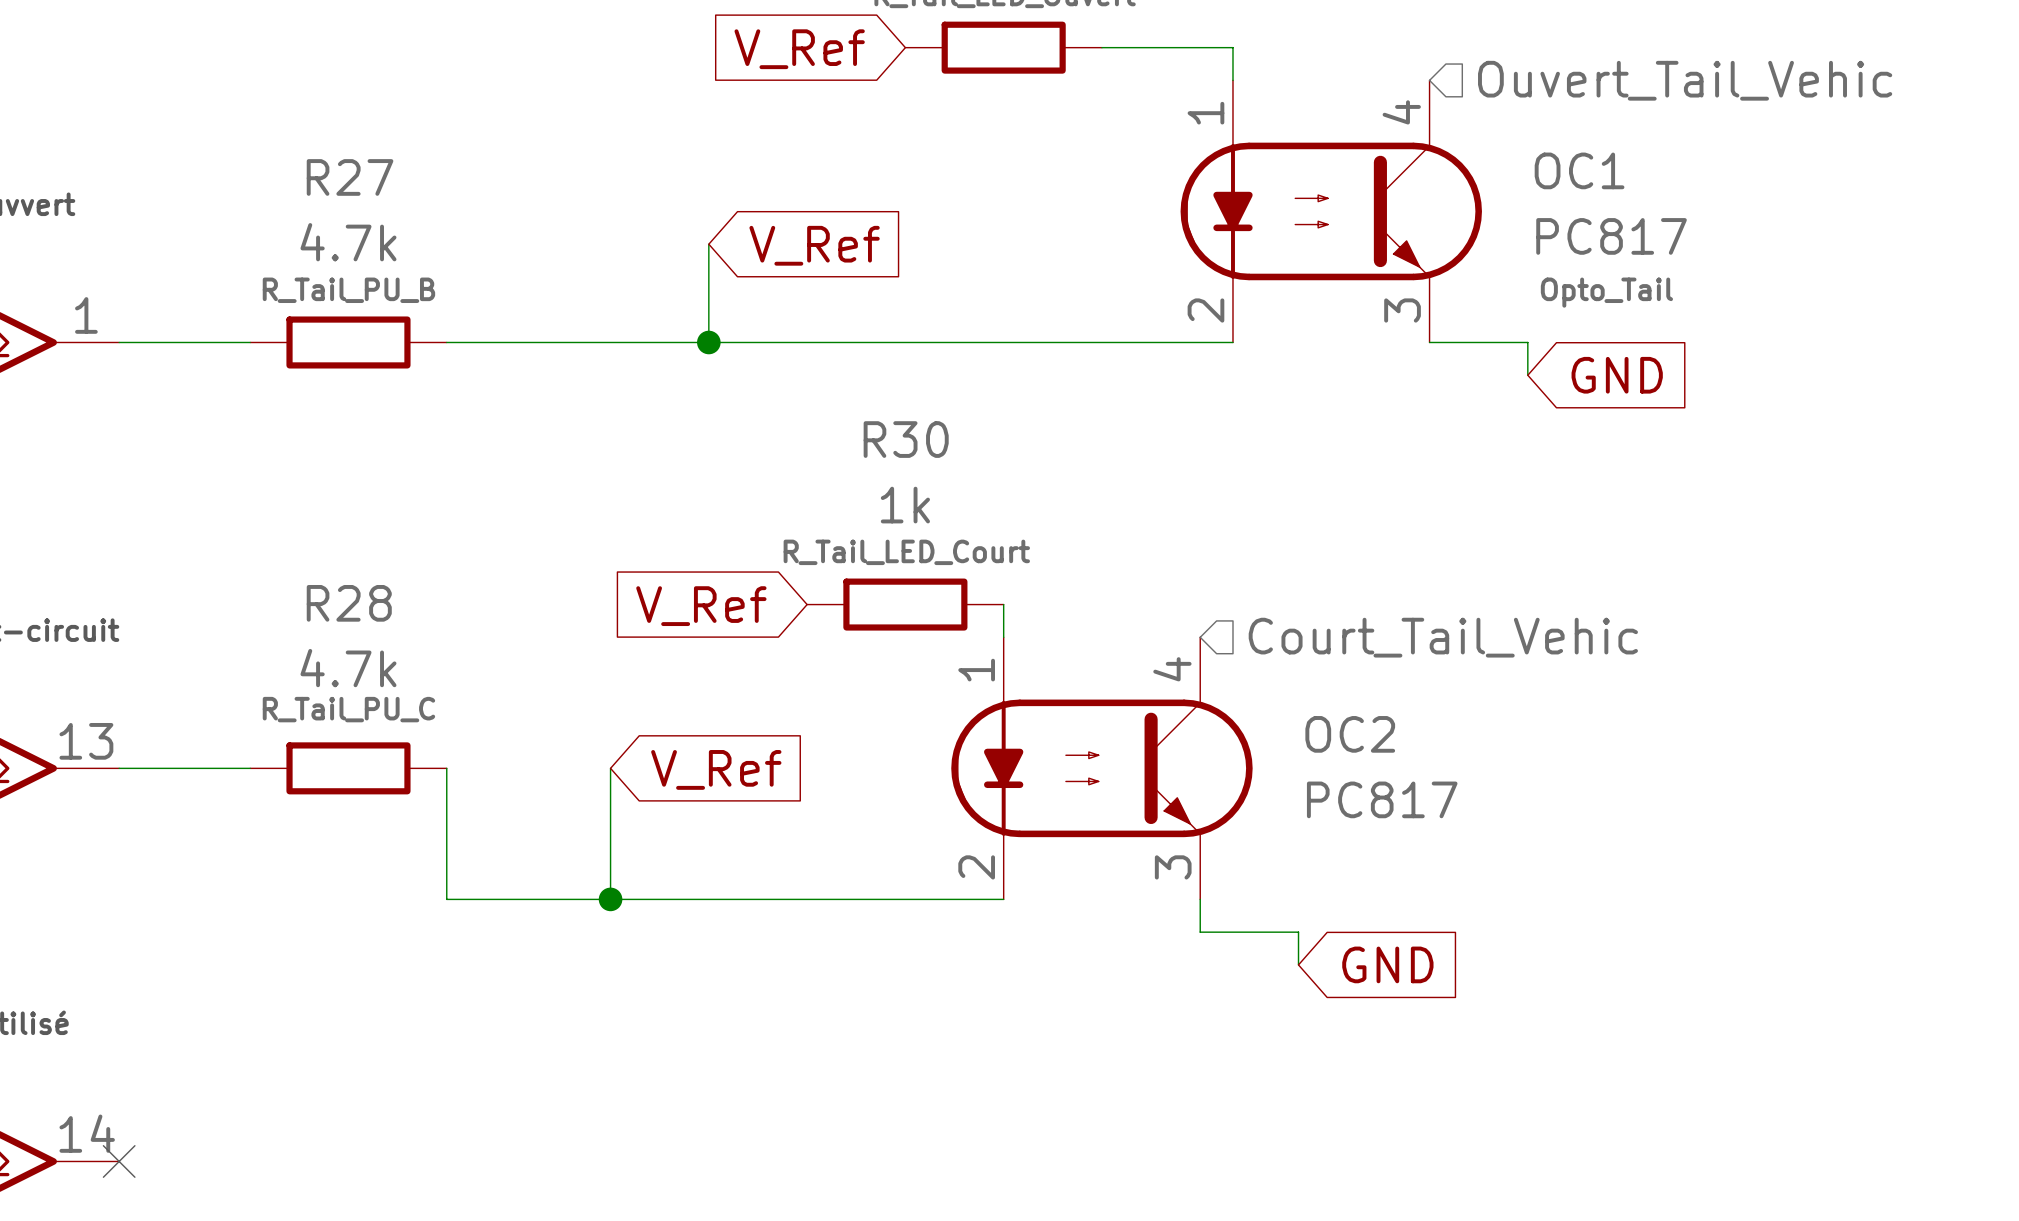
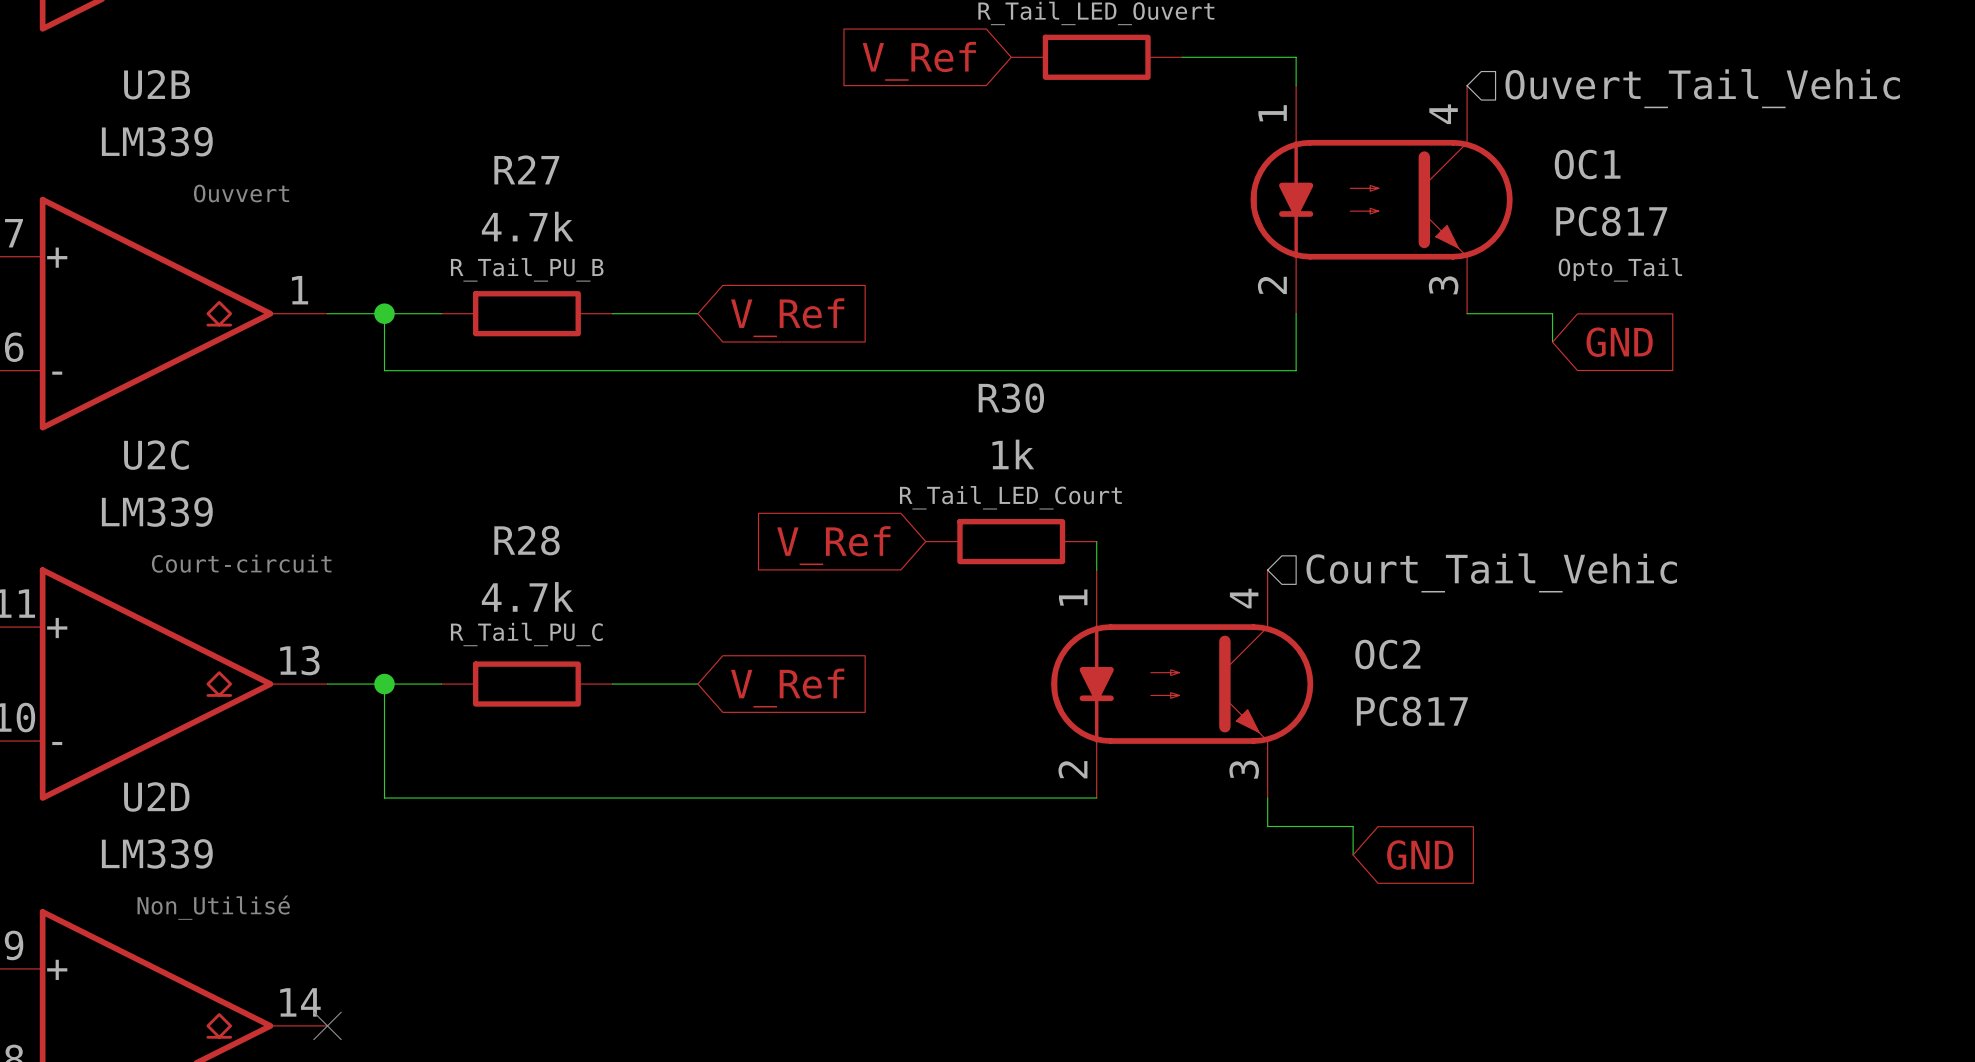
wire: (708, 244) (708, 342) -> none
global label position: V_Ref (814, 245) -> V_Ref (787, 317)
junction: none -> (384, 313)
wire: (545, 342) (1232, 342) -> (384, 313) (384, 370) (1296, 370) (1296, 313)
junction: (708, 342) -> none
wire: none -> (384, 684) (384, 798) (612, 798)
junction: none -> (384, 684)
wire: (446, 768) (446, 899) -> (612, 684) (697, 684)
wire: (610, 768) (610, 899) -> none
global label position: V_Ref (716, 769) -> V_Ref (787, 688)
junction: (610, 899) -> none

